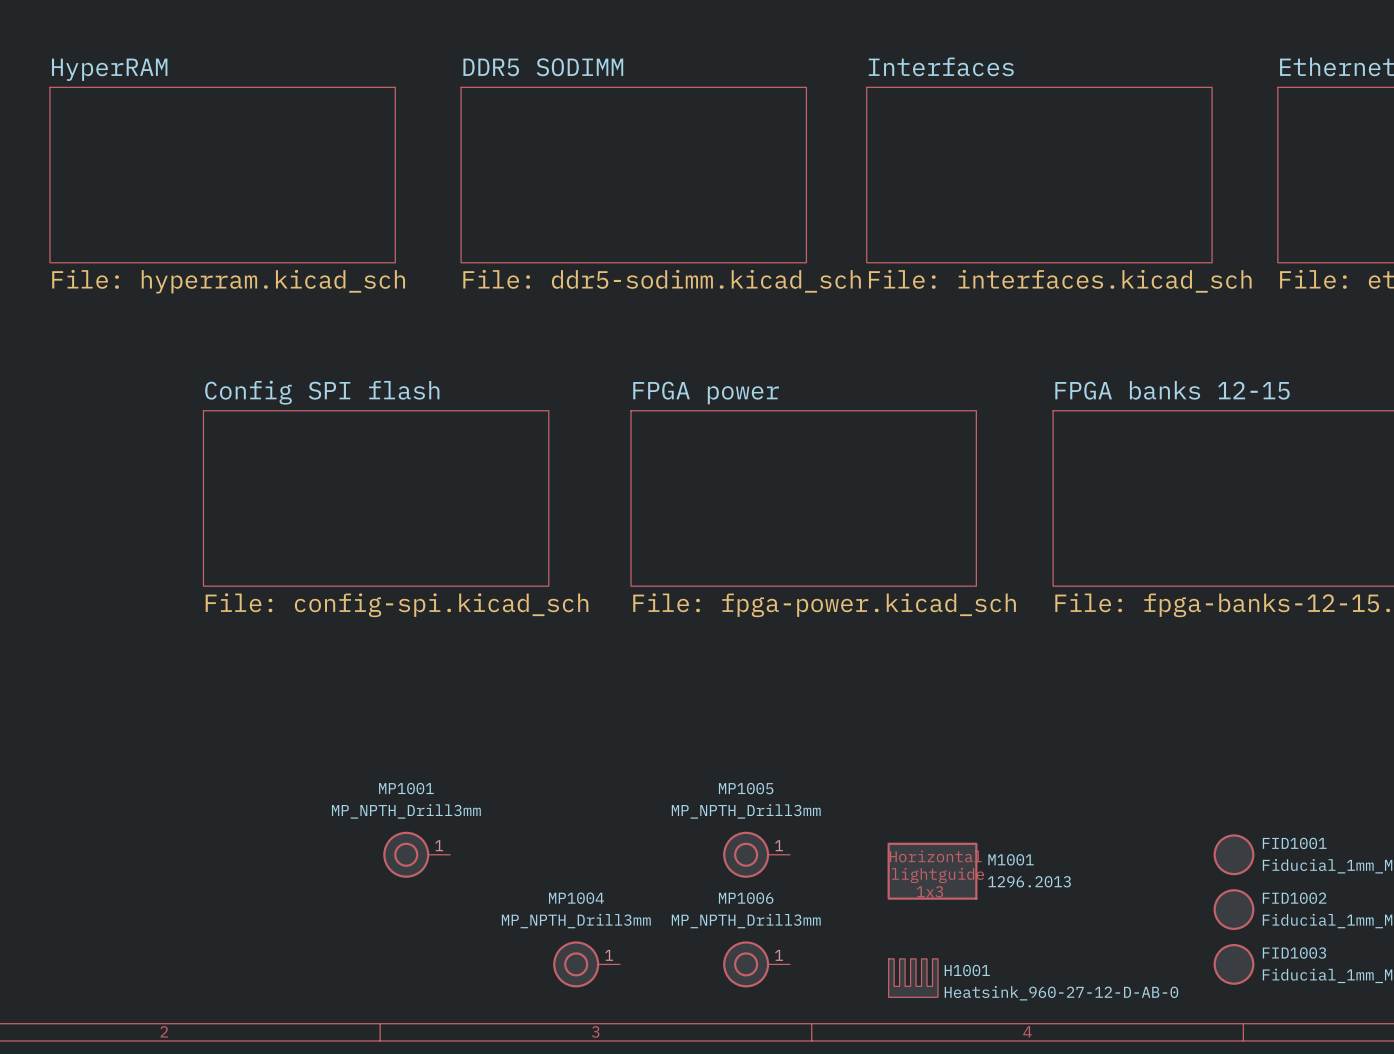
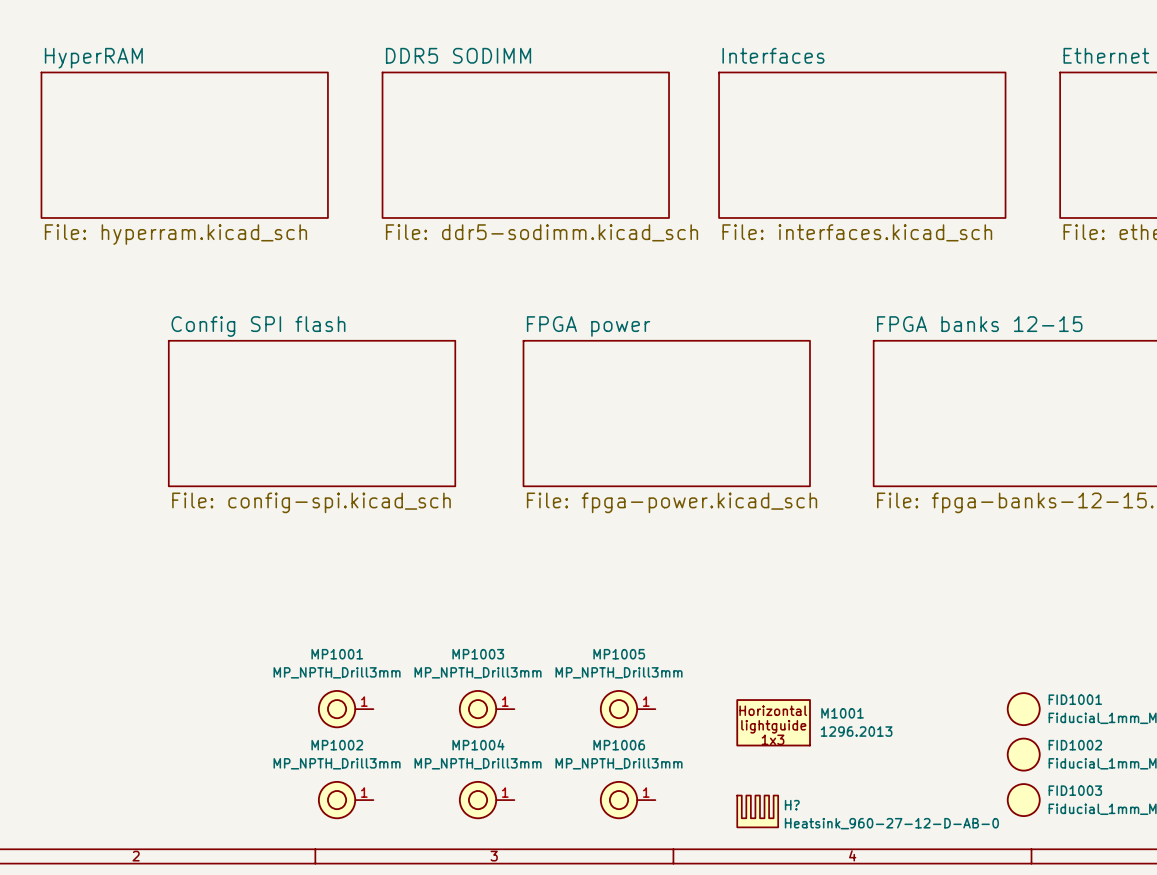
MP1003: none -> MP_NPTH_Drill3mm (486, 709)
MP1002: none -> MP_NPTH_Drill3mm (345, 800)
H1001 name: H1001 (967, 970) -> H? (792, 805)

